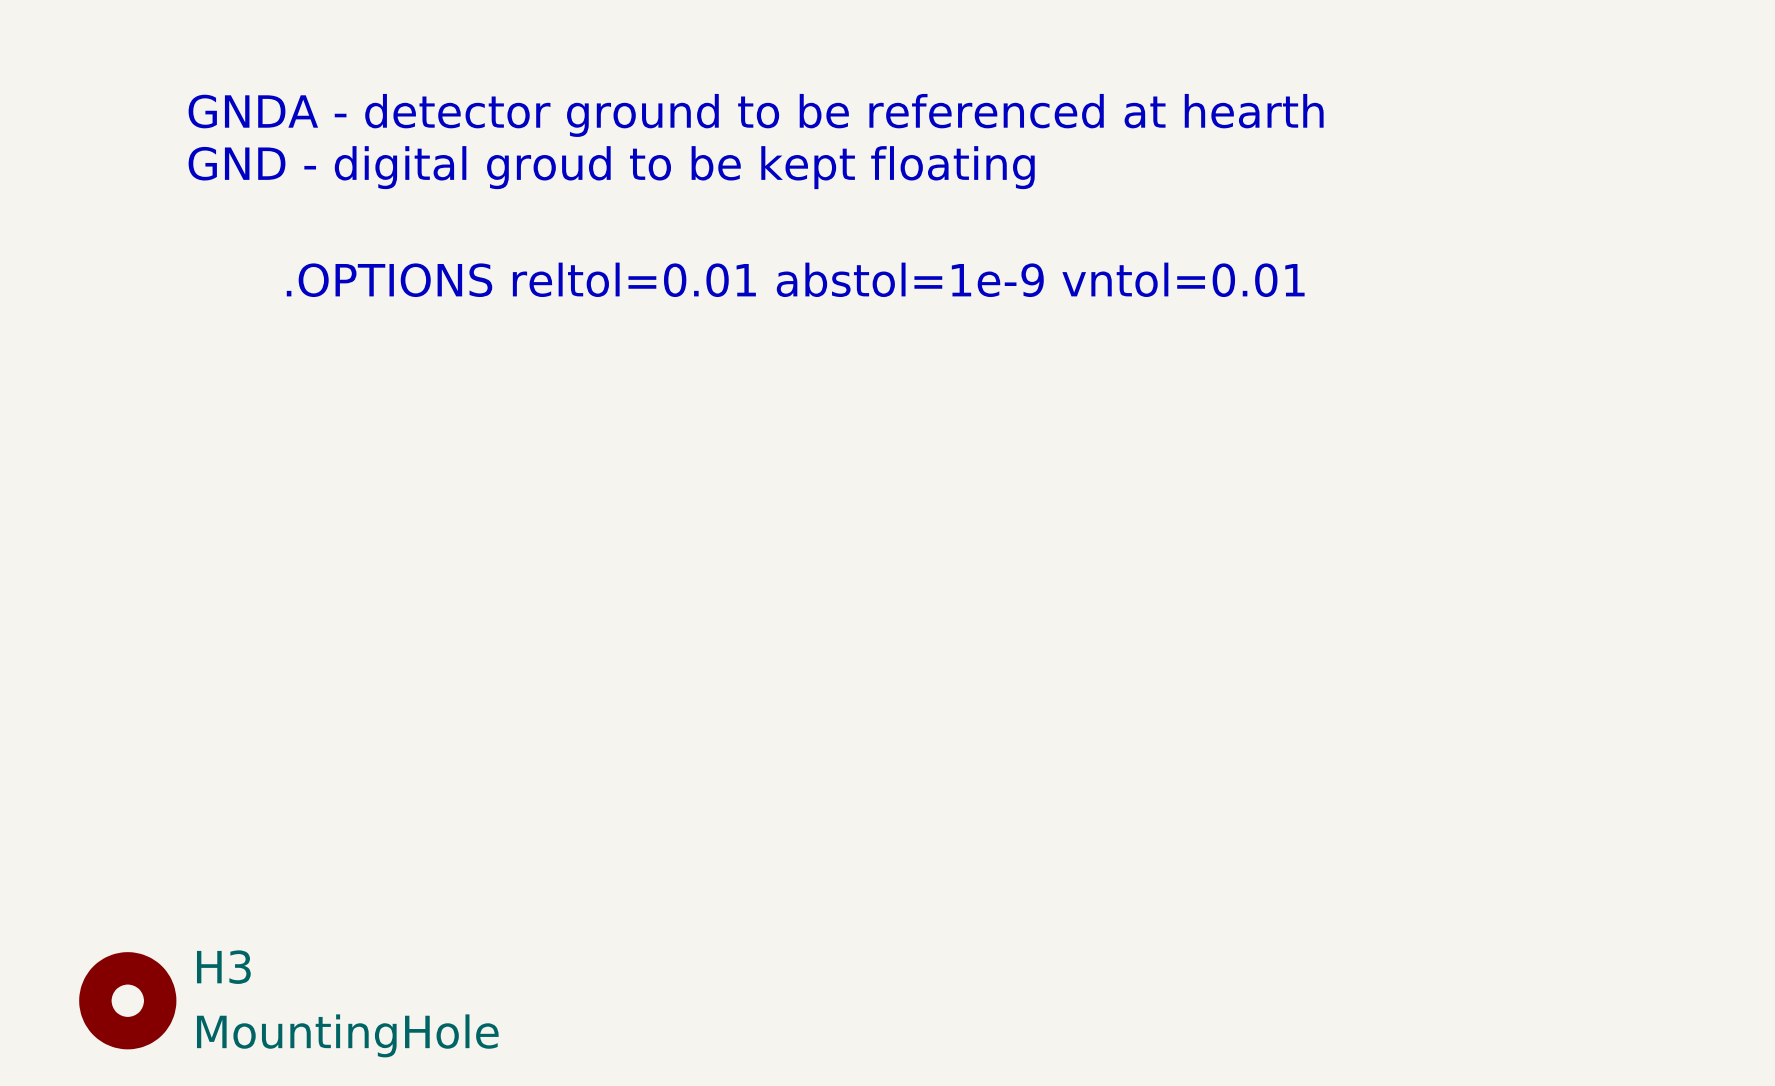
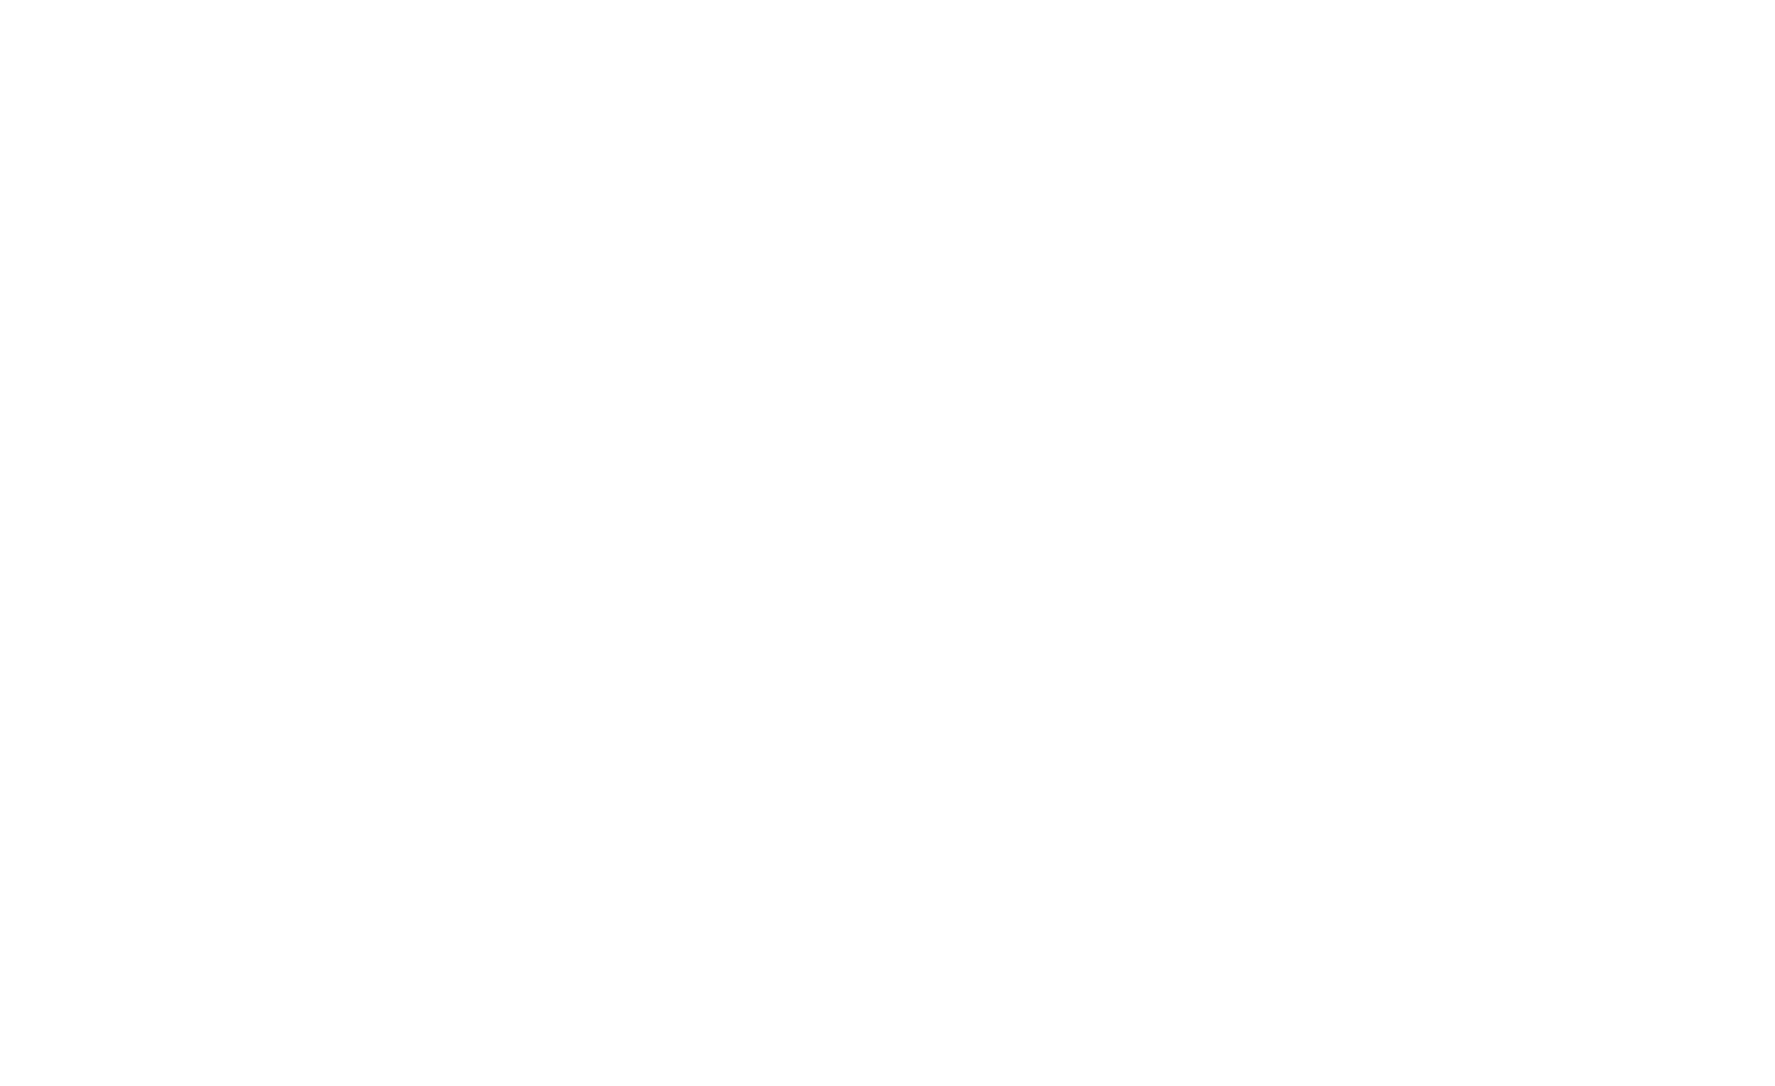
text: GNDA - detector ground to be referenced at hearth (756, 115) -> none
text: GND - digital groud to be kept floating (611, 167) -> none
text: .OPTIONS reltol=0.01 abstol=1e-9 vntol=0.01 (795, 279) -> none
H3: MountingHole (127, 1000) -> none

